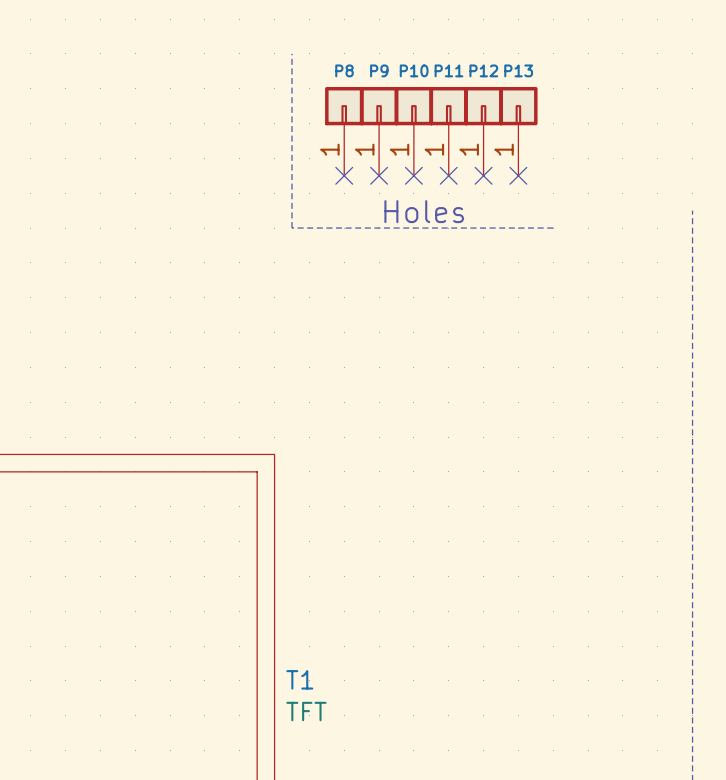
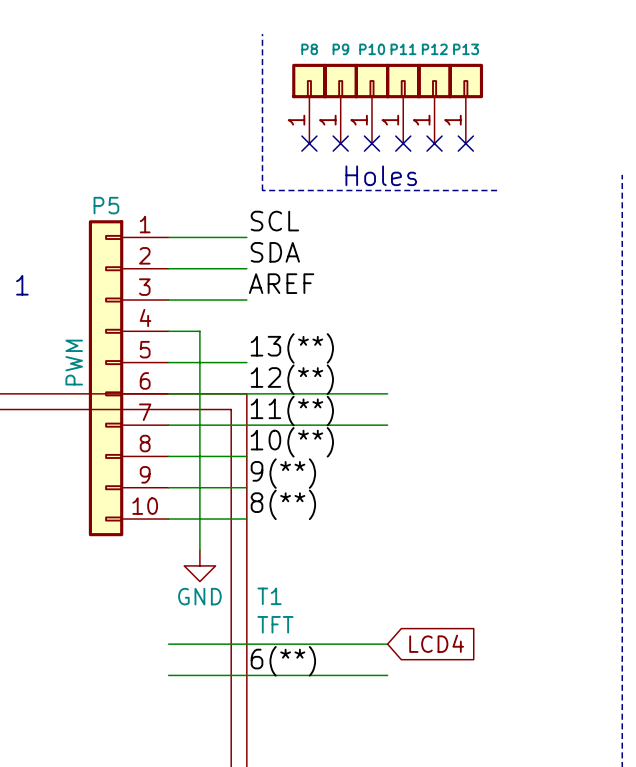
label: none -> SCL (274, 221)
wire: none -> (168, 237) (246, 237)
label: none -> SDA (275, 252)
wire: none -> (168, 268) (246, 268)
label: none -> AREF (281, 283)
text: none -> 1 (22, 285)
wire: none -> (168, 300) (246, 300)
wire: none -> (168, 331) (199, 331) (199, 550)
label: none -> 13(**) (292, 348)
wire: none -> (168, 362) (246, 362)
P5: none -> PWM (128, 378)
label: none -> 12(**) (292, 379)
wire: none -> (168, 393) (387, 393)
label: none -> 11(**) (292, 411)
wire: none -> (168, 425) (387, 425)
label: none -> 10(**) (292, 442)
wire: none -> (168, 456) (246, 456)
label: none -> 9(**) (283, 473)
wire: none -> (168, 487) (246, 487)
label: none -> 8(**) (283, 504)
wire: none -> (168, 519) (246, 519)
power symbol: none -> GND (199, 565)
global label: none -> LCD4 (436, 643)
wire: none -> (168, 644) (387, 644)
label: none -> 6(**) (283, 661)
wire: none -> (168, 675) (387, 675)

